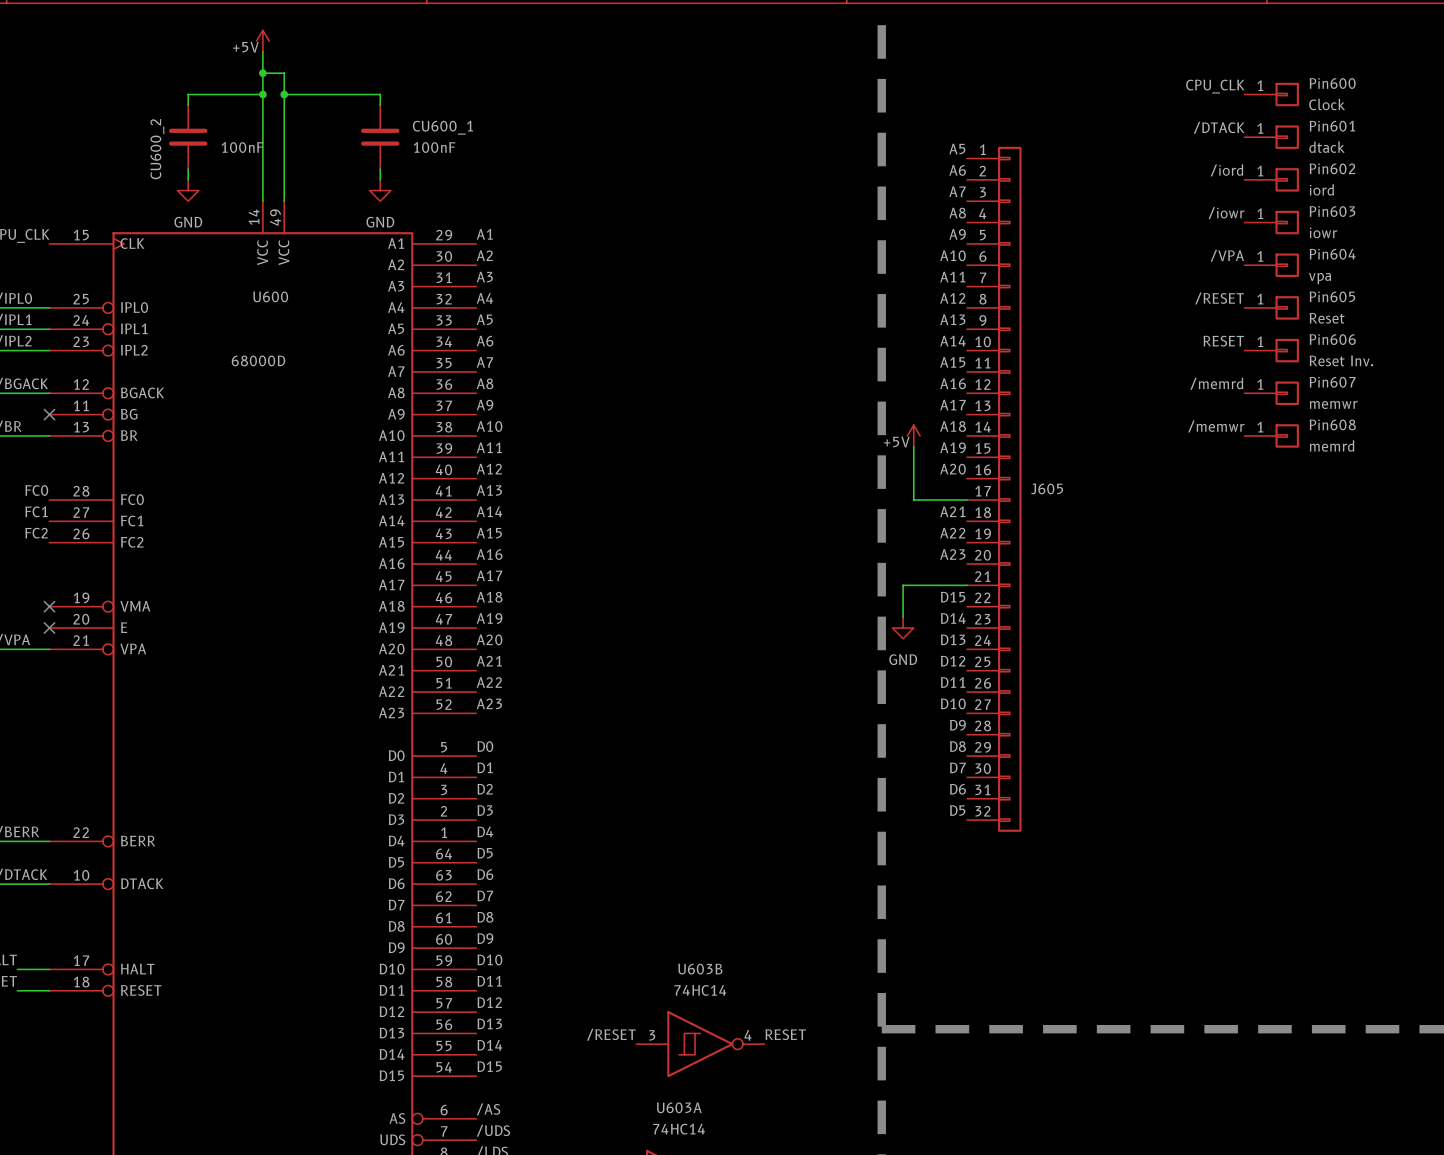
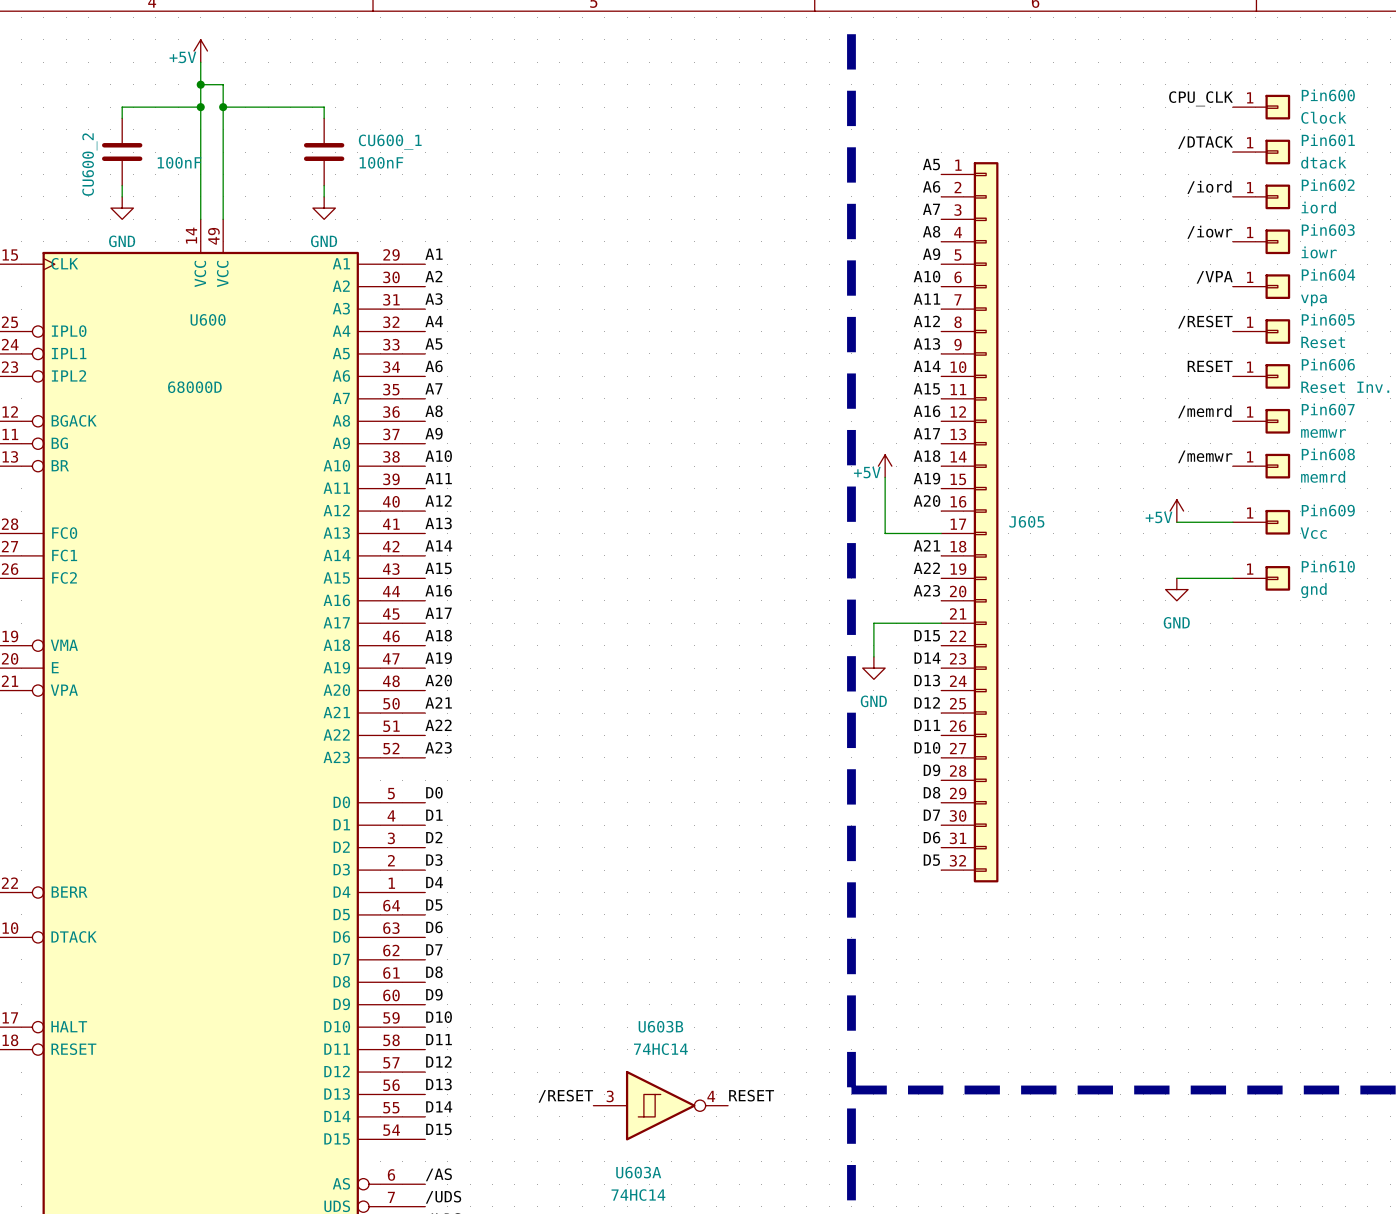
power symbol: none -> +5V (1176, 511)
wire: none -> (1176, 522) (1232, 522)
Pin609: none -> Vcc (1261, 522)
wire: none -> (1176, 578) (1232, 578)
Pin610: none -> gnd (1261, 578)
power symbol: none -> GND (1176, 589)

